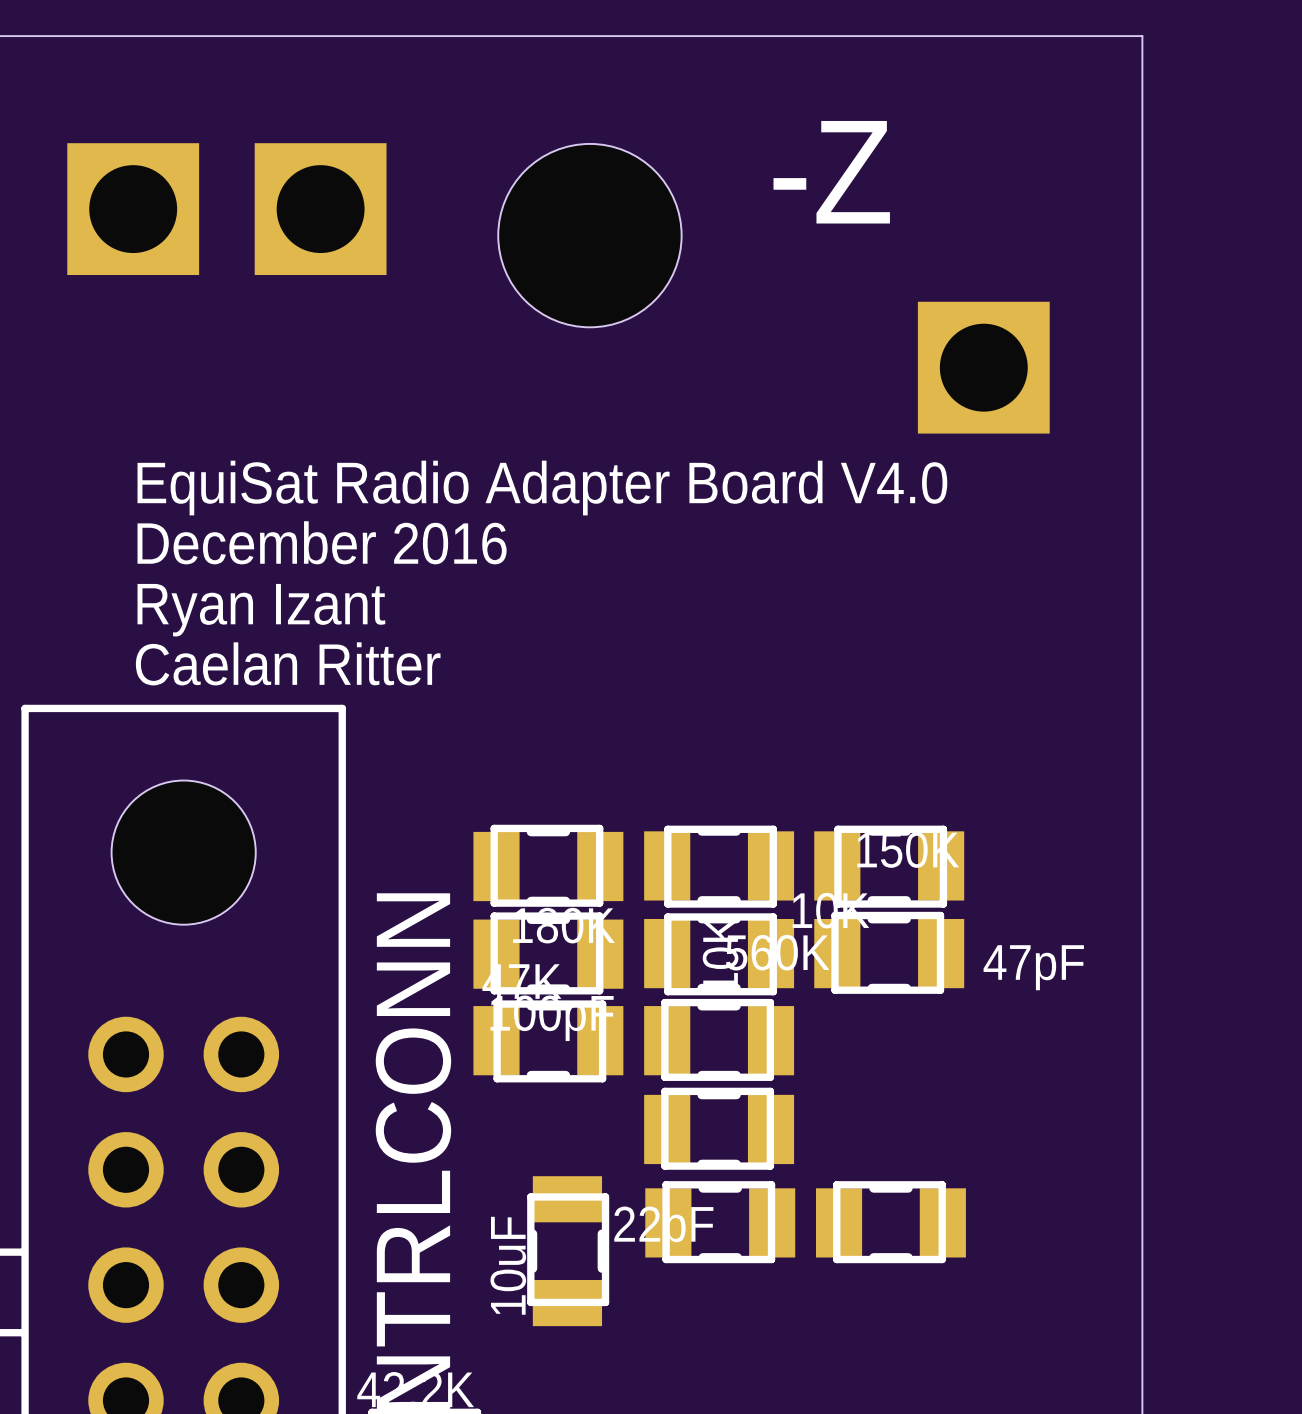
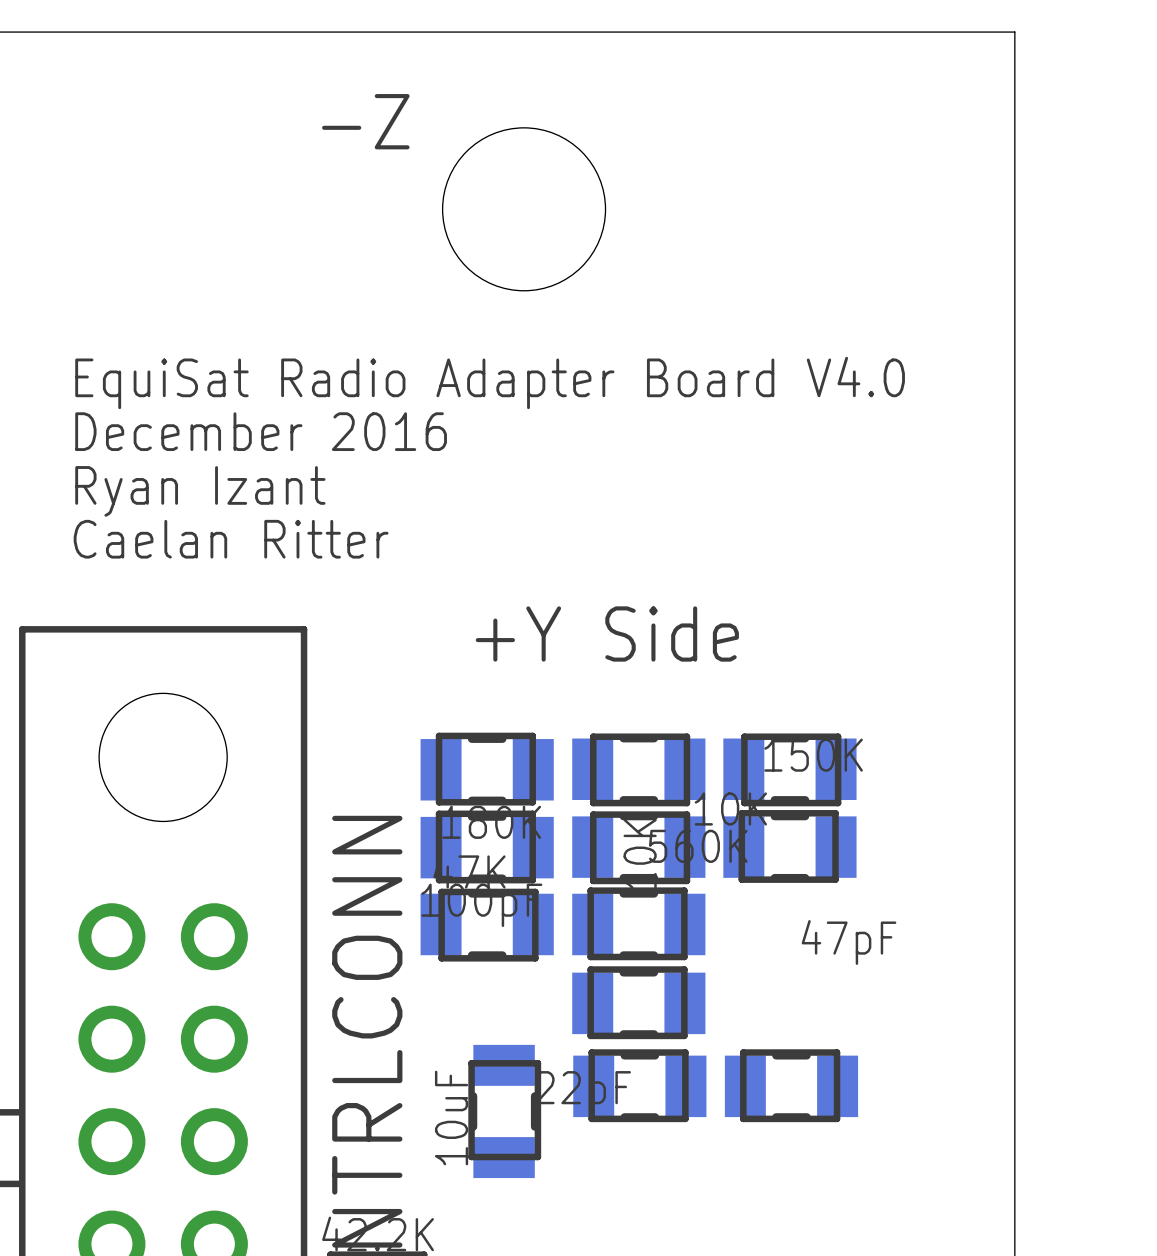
text: none -> -Z (365, 121)
text: -Z (831, 172) -> none
part: (133, 209) -> none
part: (320, 209) -> none
part: (983, 367) -> none
text position: EquiSat Radio Adapter Board V4.0 (542, 488) -> EquiSat Radio Adapter Board V4.0 (490, 382)
text position: December 2016 (322, 542) -> December 2016 (261, 431)
text position: Ryan Izant (261, 610) -> Ryan Izant (200, 491)
text position: Caelan Ritter (288, 663) -> Caelan Ritter (231, 539)
text: none -> +Y Side (607, 634)
part value position: 47pF (1033, 967) -> 47pF (849, 942)

